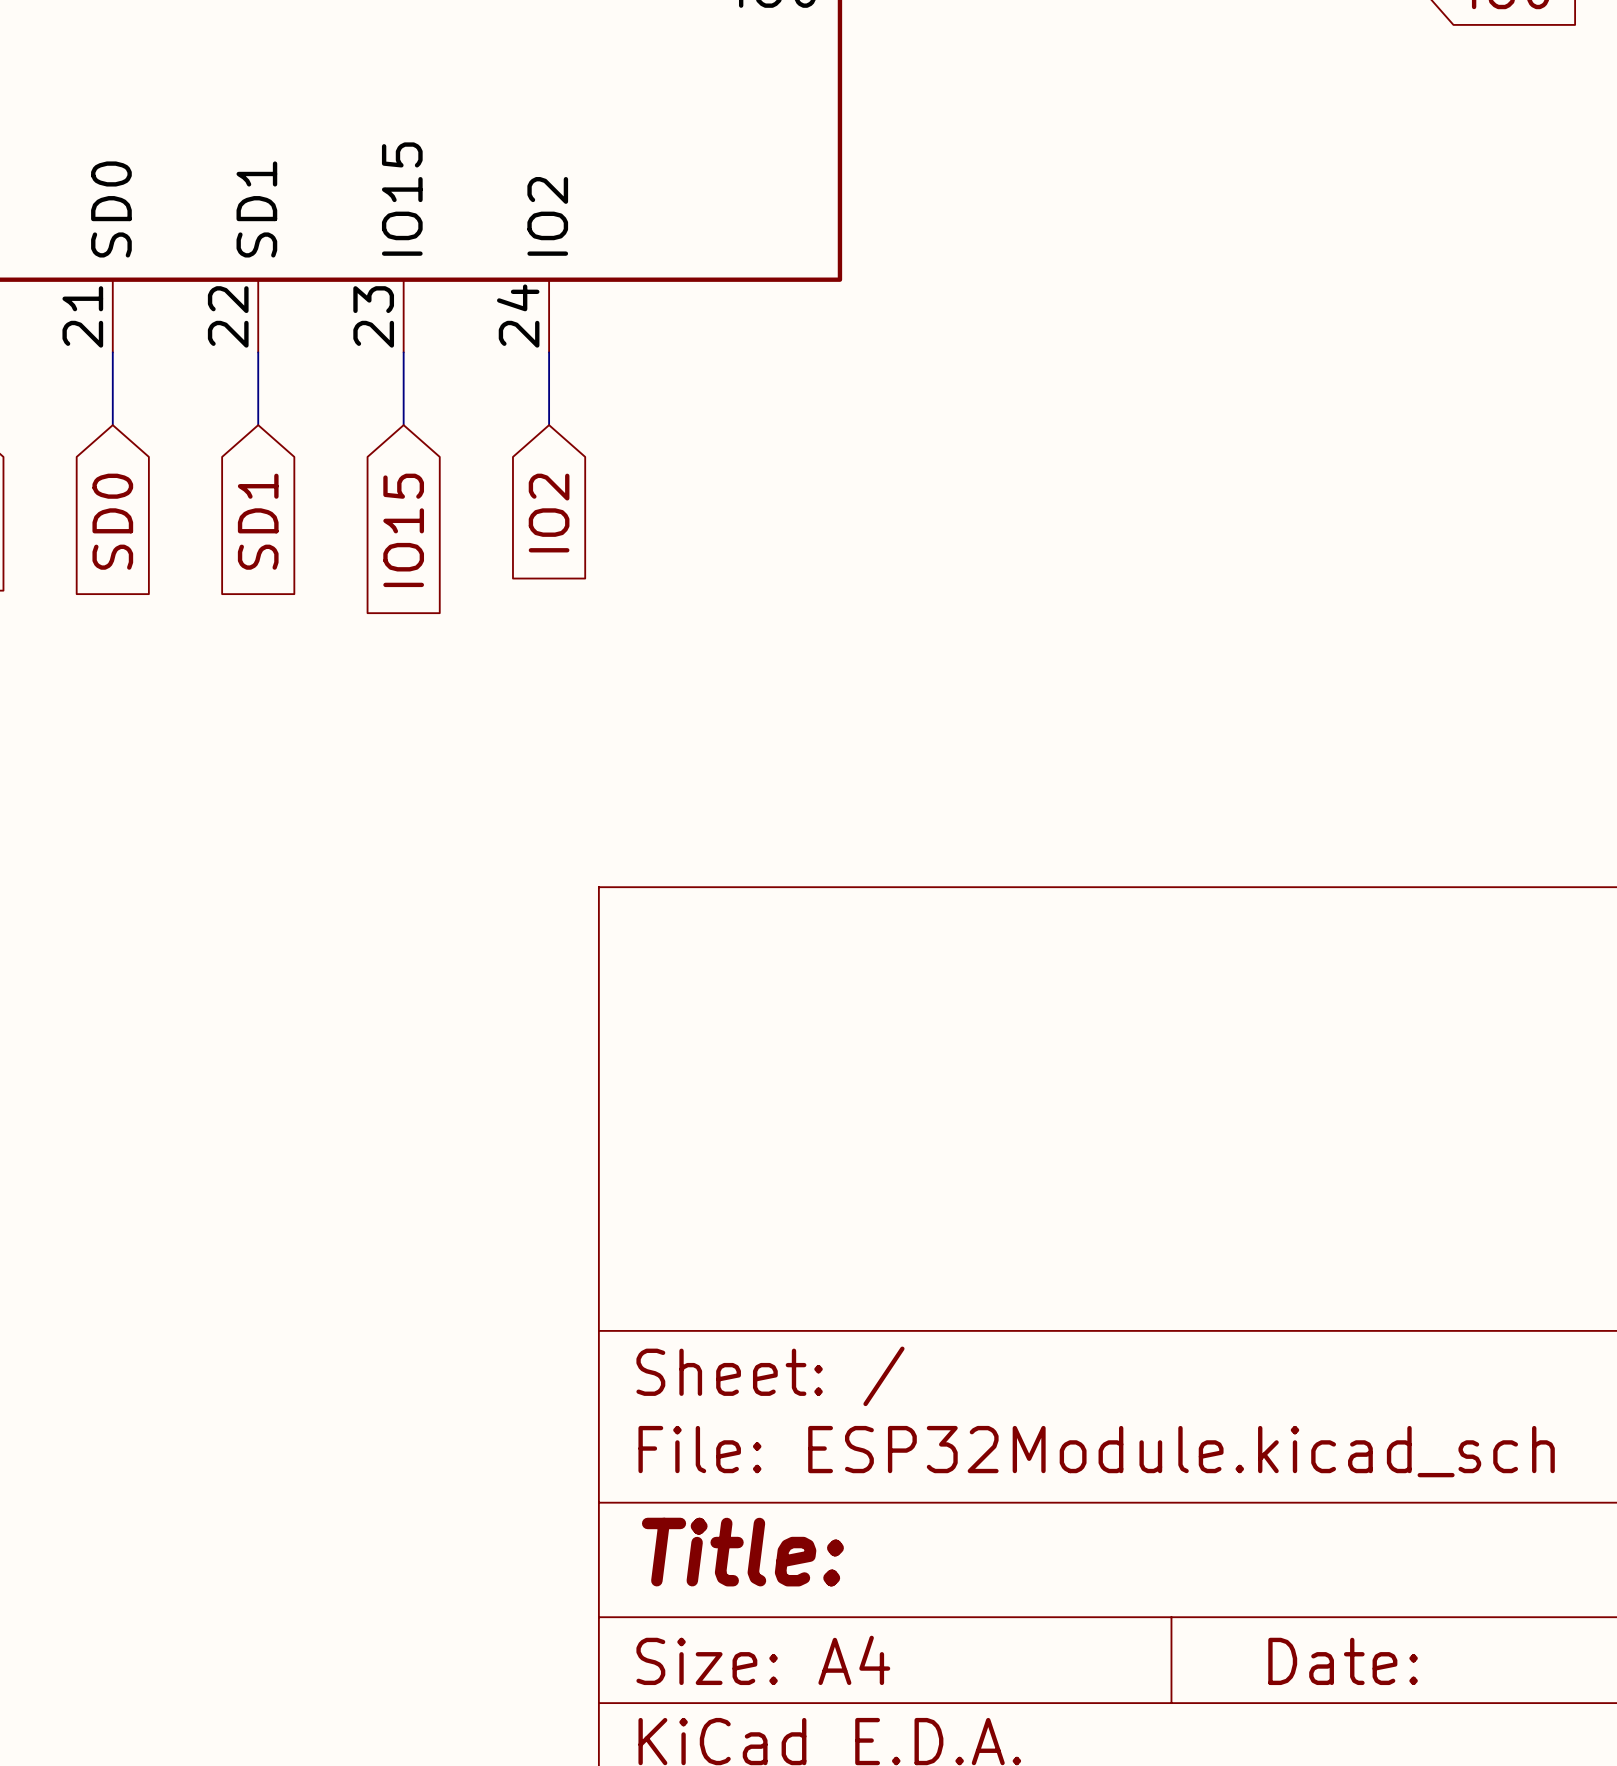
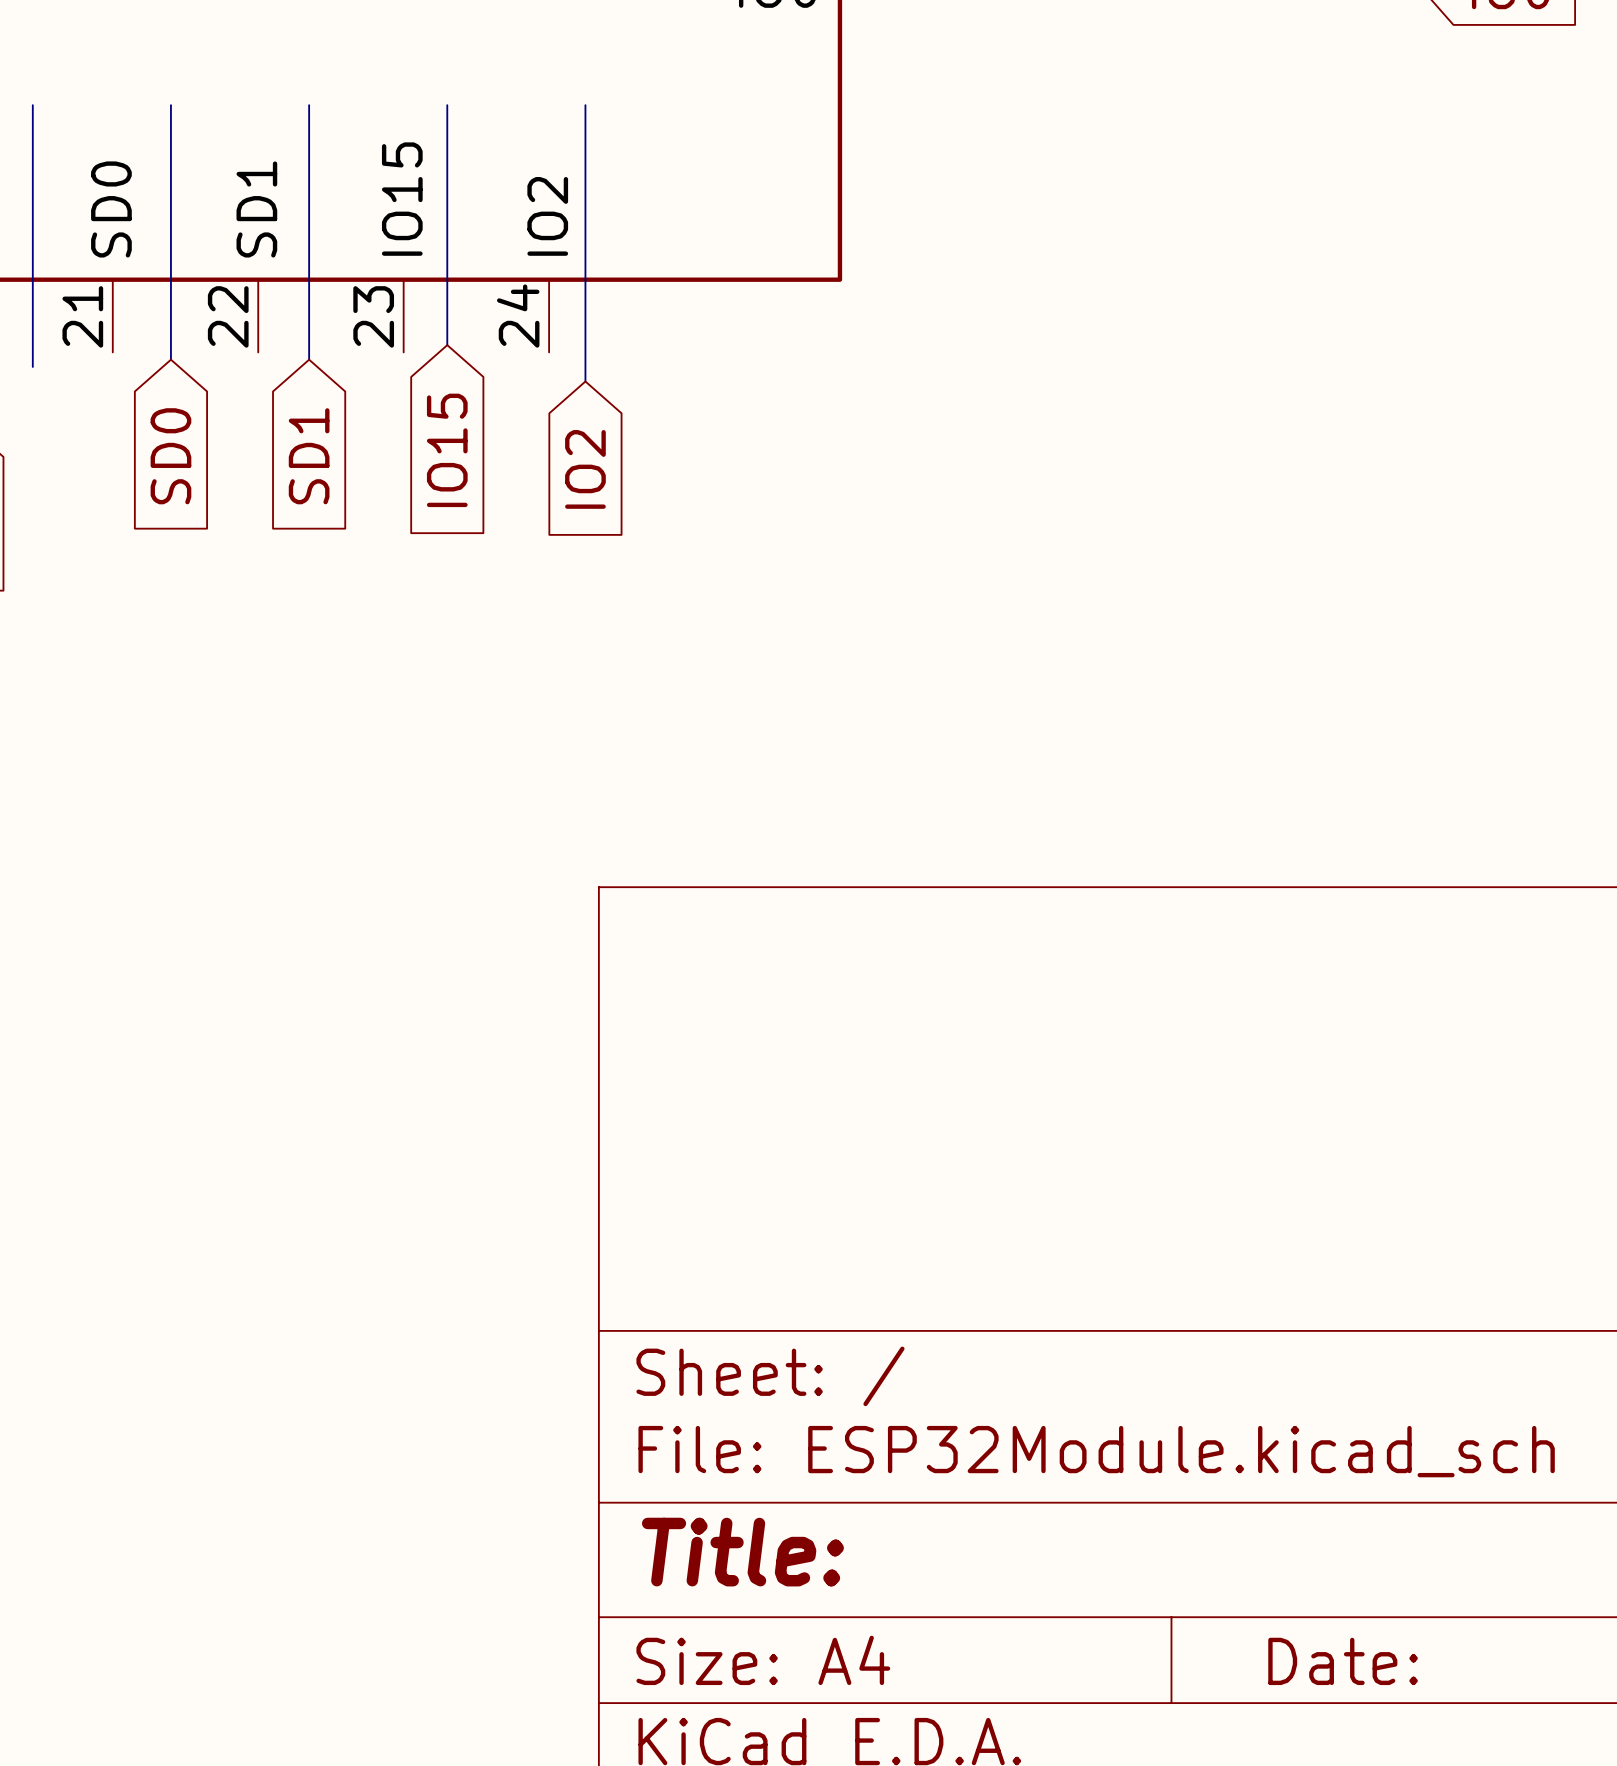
wire: none -> (32, 105) (32, 366)
wire: none -> (170, 105) (170, 359)
wire: none -> (309, 105) (309, 359)
wire: none -> (447, 105) (447, 345)
wire: none -> (585, 105) (585, 381)
wire: (112, 352) (112, 425) -> none
wire: (258, 352) (258, 425) -> none
wire: (403, 352) (403, 425) -> none
wire: (549, 352) (549, 425) -> none
global label position: IO2 (549, 513) -> IO2 (585, 469)
global label position: SD0 (112, 521) -> SD0 (170, 456)
global label position: SD1 (258, 521) -> SD1 (309, 456)
global label position: IO15 (403, 530) -> IO15 (447, 450)

